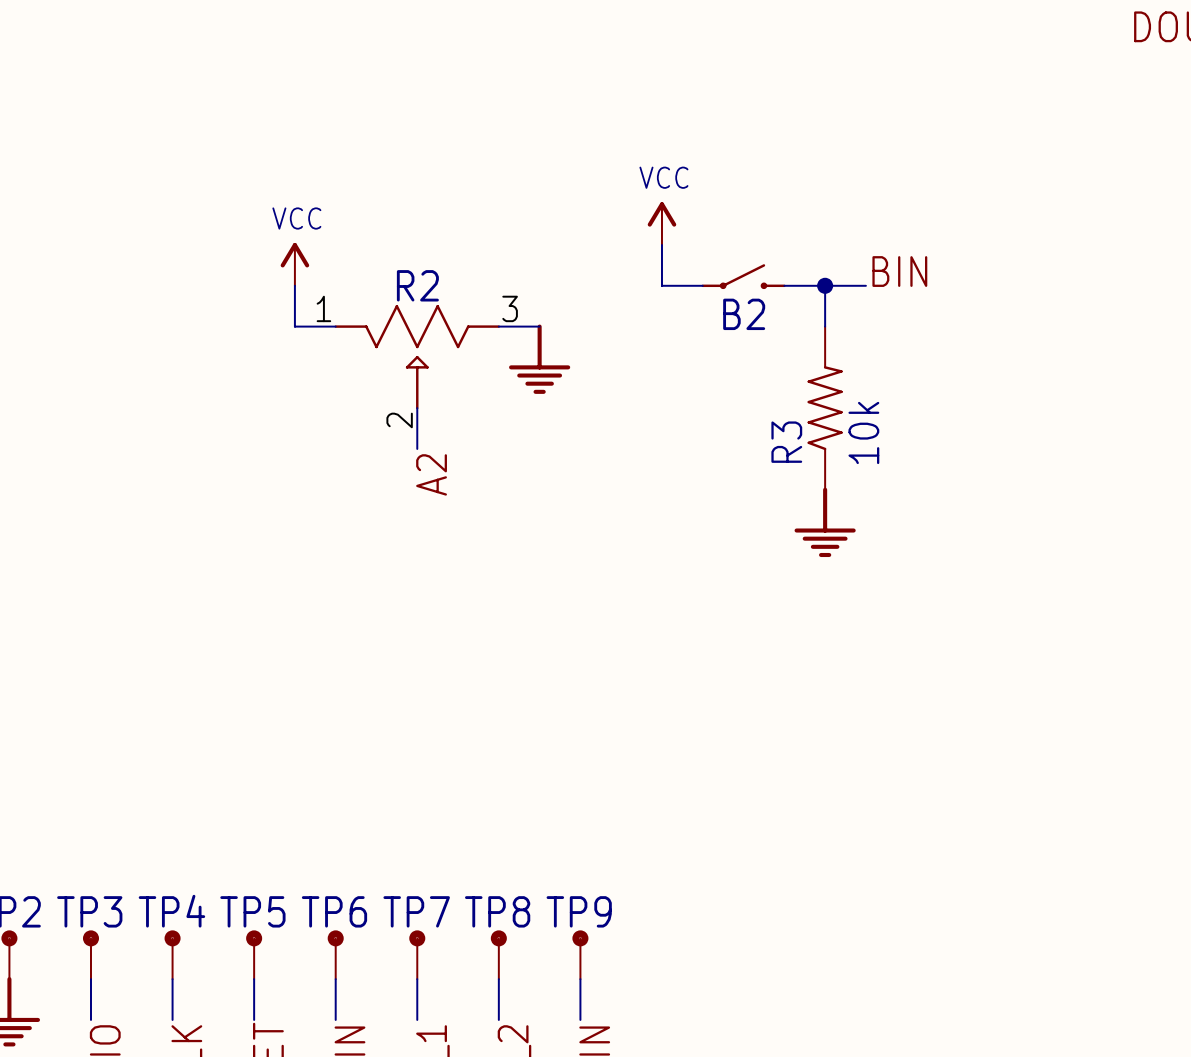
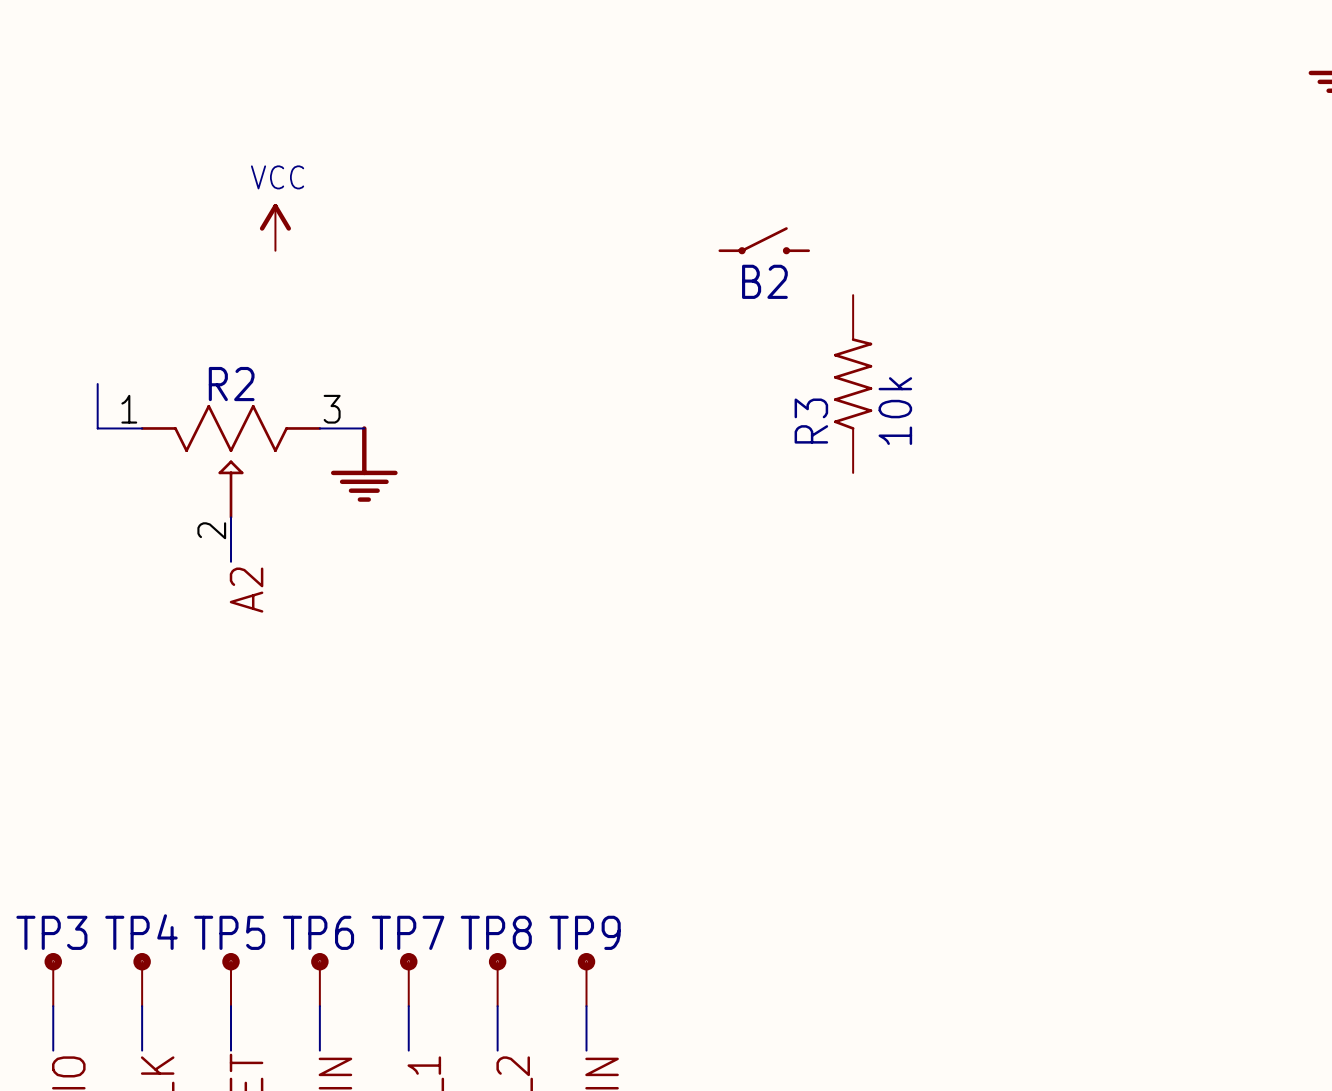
power symbol: VCC (661, 223) -> none
wire: (661, 245) (661, 285) (702, 285) -> none
label: BIN (899, 271) -> none
wire: (294, 285) (294, 326) (335, 326) -> (97, 384) (97, 428) (142, 428)
wire: (784, 285) (865, 285) -> none
wire: (825, 285) (825, 326) -> none
junction: (825, 285) -> none
wire: (498, 326) (539, 326) -> (319, 428) (364, 428)
R2 position: (417, 357) -> (231, 461)
power symbol position: (539, 359) -> (364, 464)
wire: (417, 408) (417, 448) -> (231, 517) (231, 561)
label position: A2 (431, 474) -> A2 (246, 590)
power symbol: (825, 522) -> none

